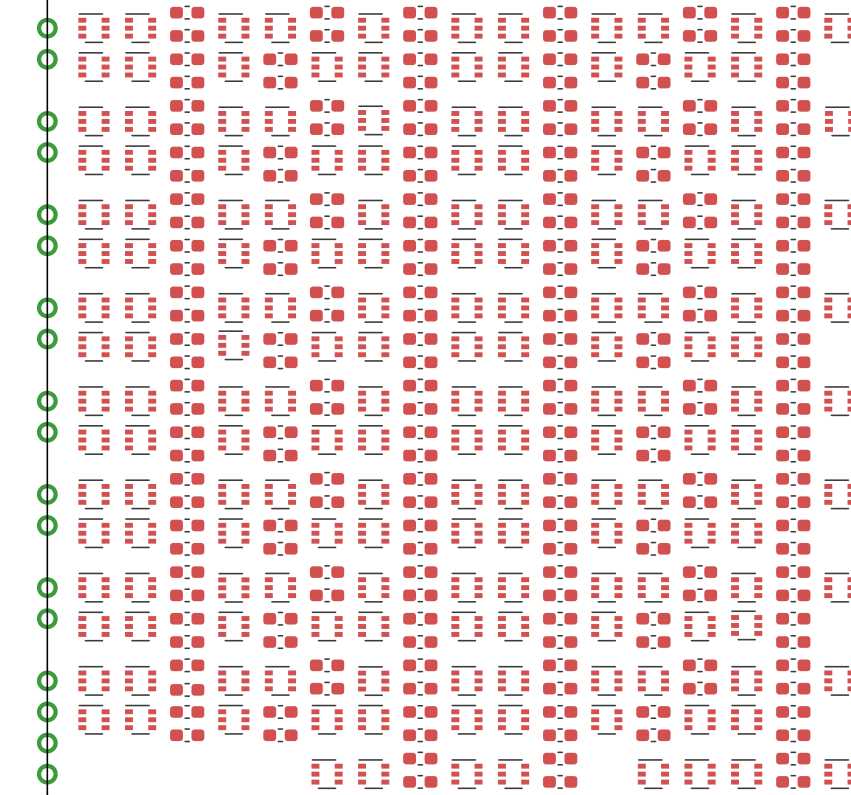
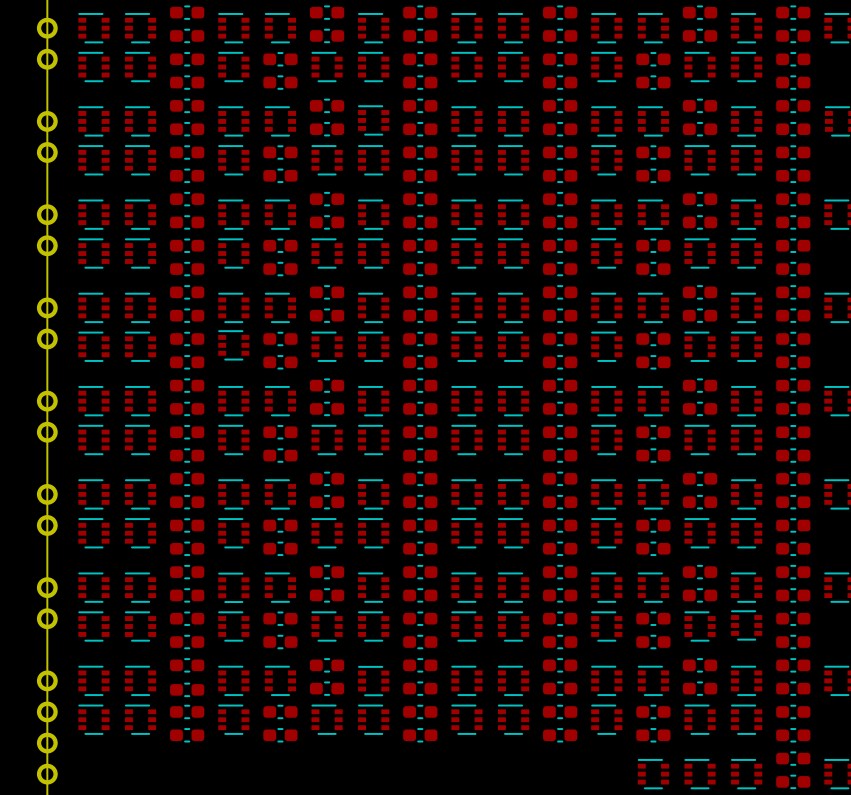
part: (420, 758) -> none
part: (560, 758) -> none
part: (327, 774) -> none
part: (373, 774) -> none
part: (466, 774) -> none
part: (513, 774) -> none
part: (420, 781) -> none
part: (560, 781) -> none

